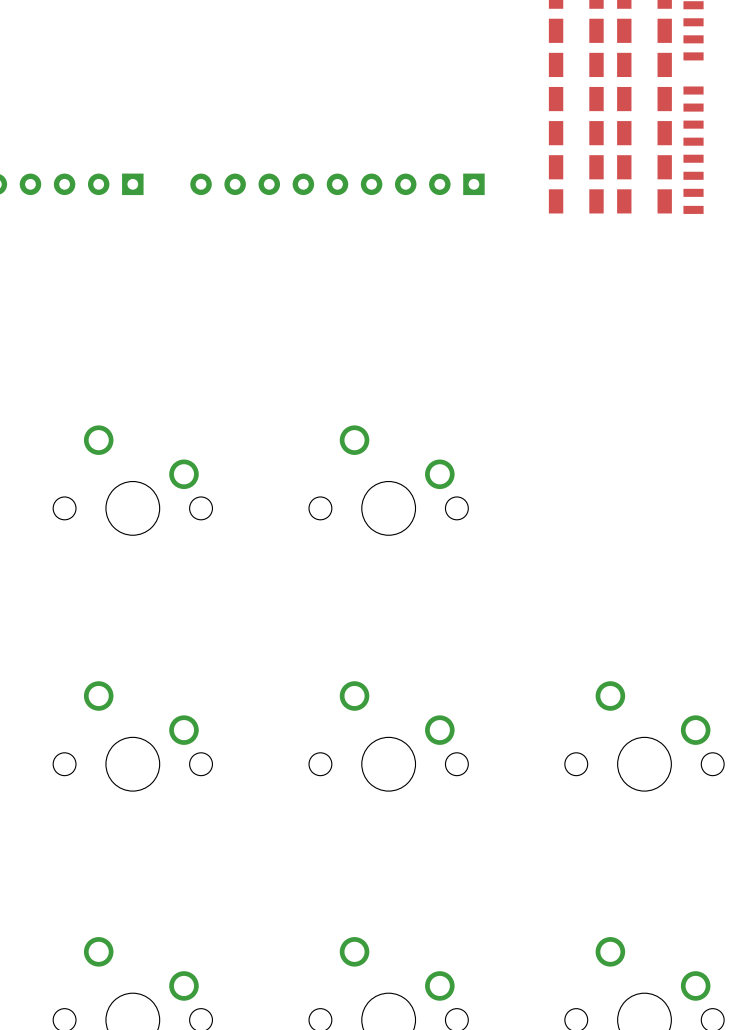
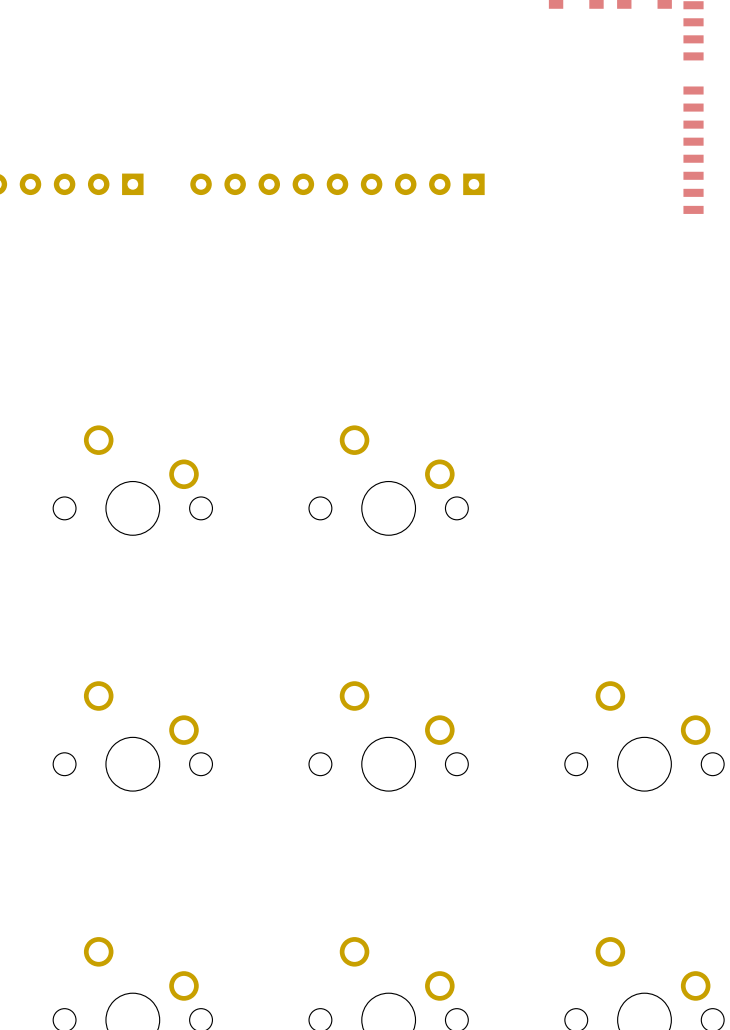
part: (576, 30) -> none
part: (644, 30) -> none
part: (576, 64) -> none
part: (644, 64) -> none
part: (576, 99) -> none
part: (644, 99) -> none
part: (576, 133) -> none
part: (644, 133) -> none
part: (576, 167) -> none
part: (644, 167) -> none
part: (576, 201) -> none
part: (644, 201) -> none

